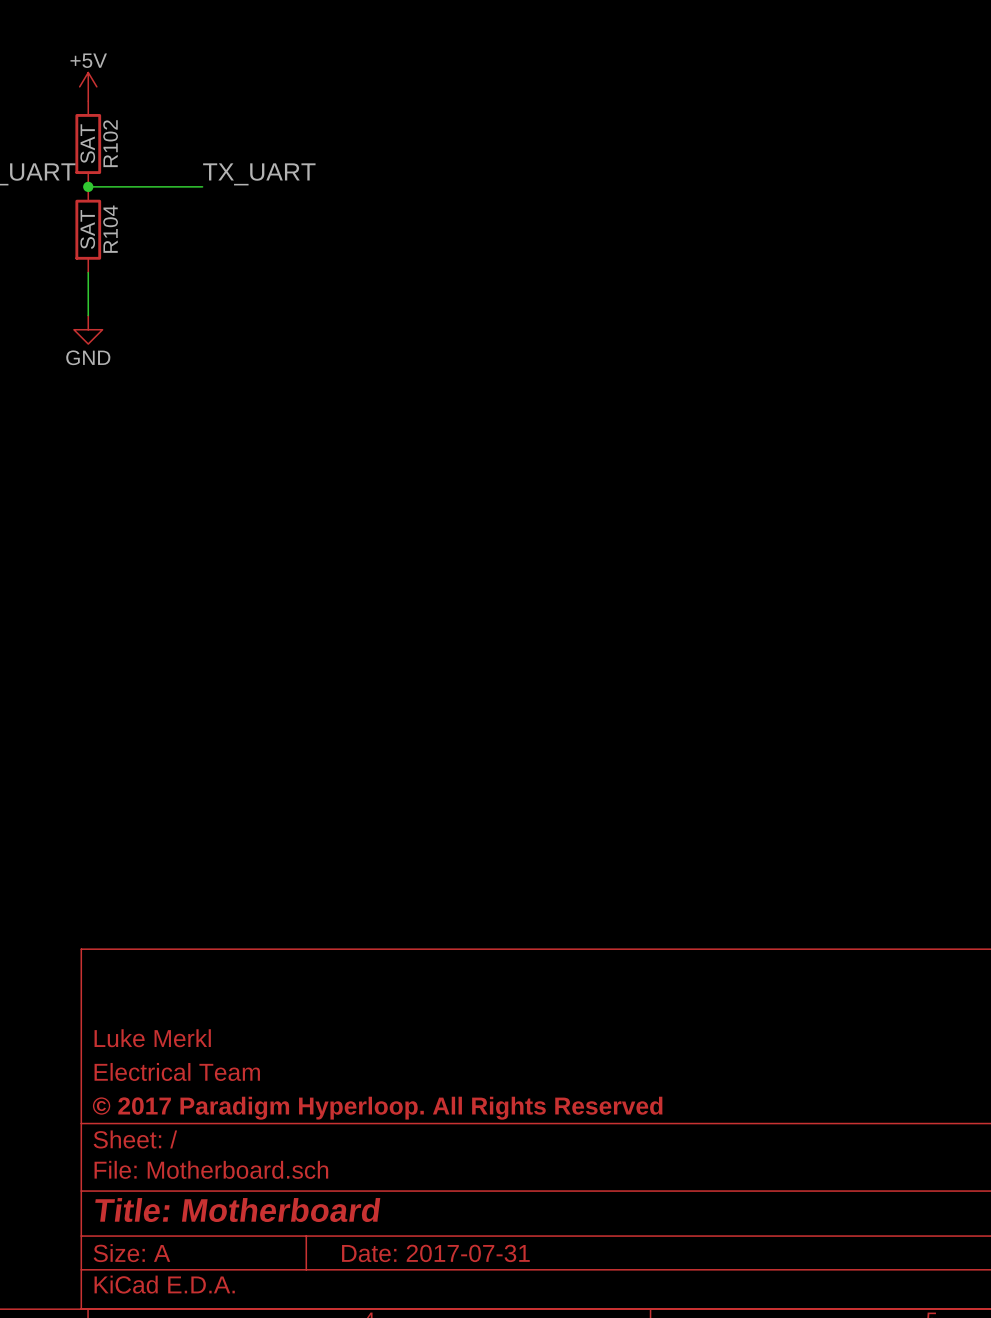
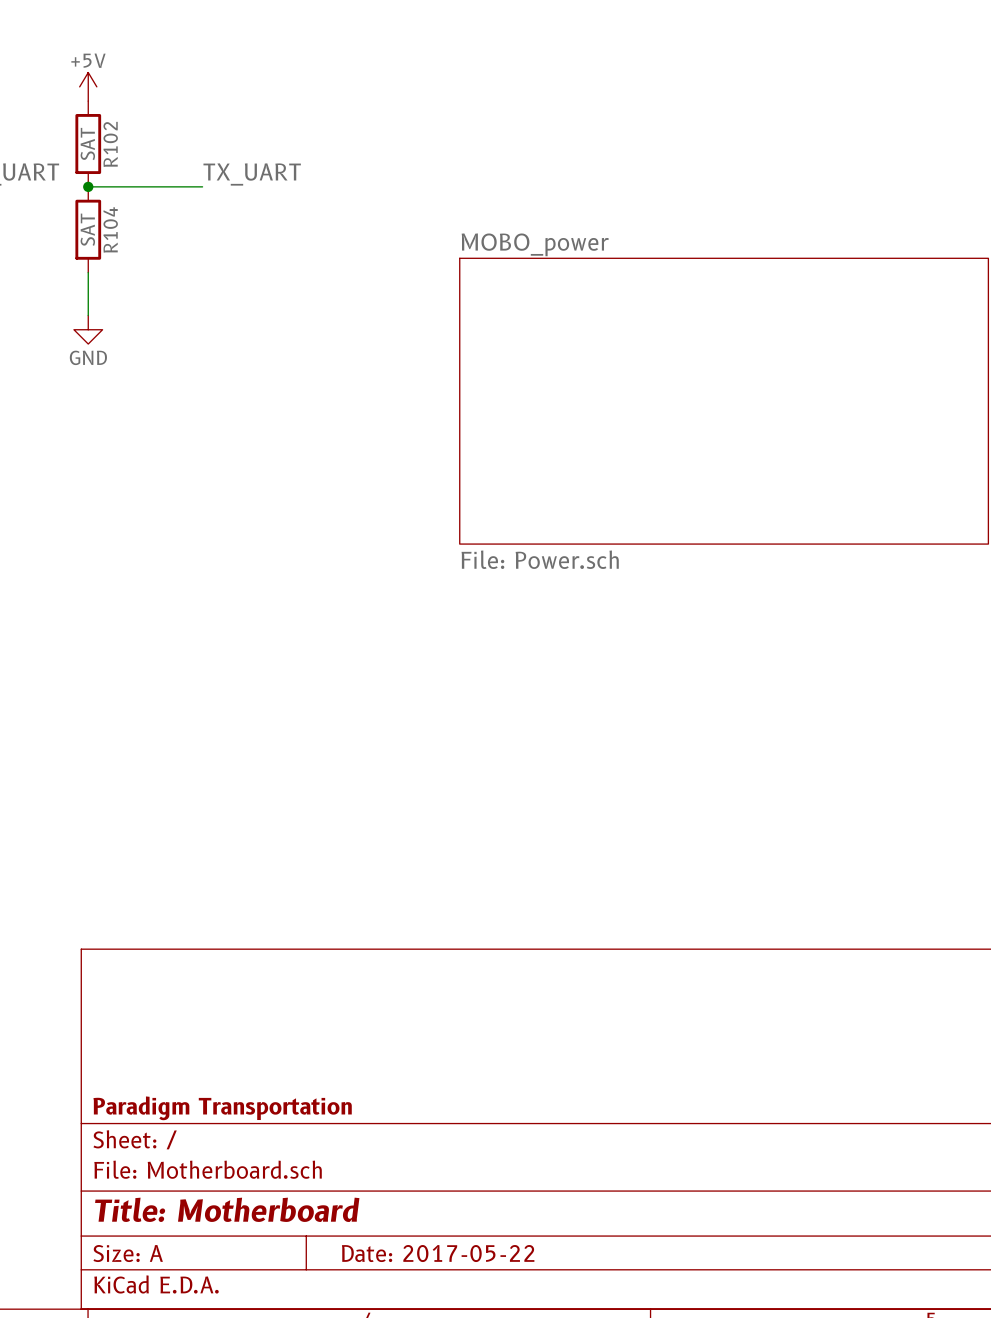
sheet MOBO_power: none -> File: Power.sch (724, 401)
title block: Luke Merkl (152, 1038) -> none
title block: Electrical Team (177, 1071) -> none
title block: © 2017 Paradigm Hyperloop. All Rights Reserved (377, 1108) -> Paradigm Transportation (222, 1108)
title block: Date: 2017-07-31 (435, 1253) -> Date: 2017-05-22 (438, 1253)

